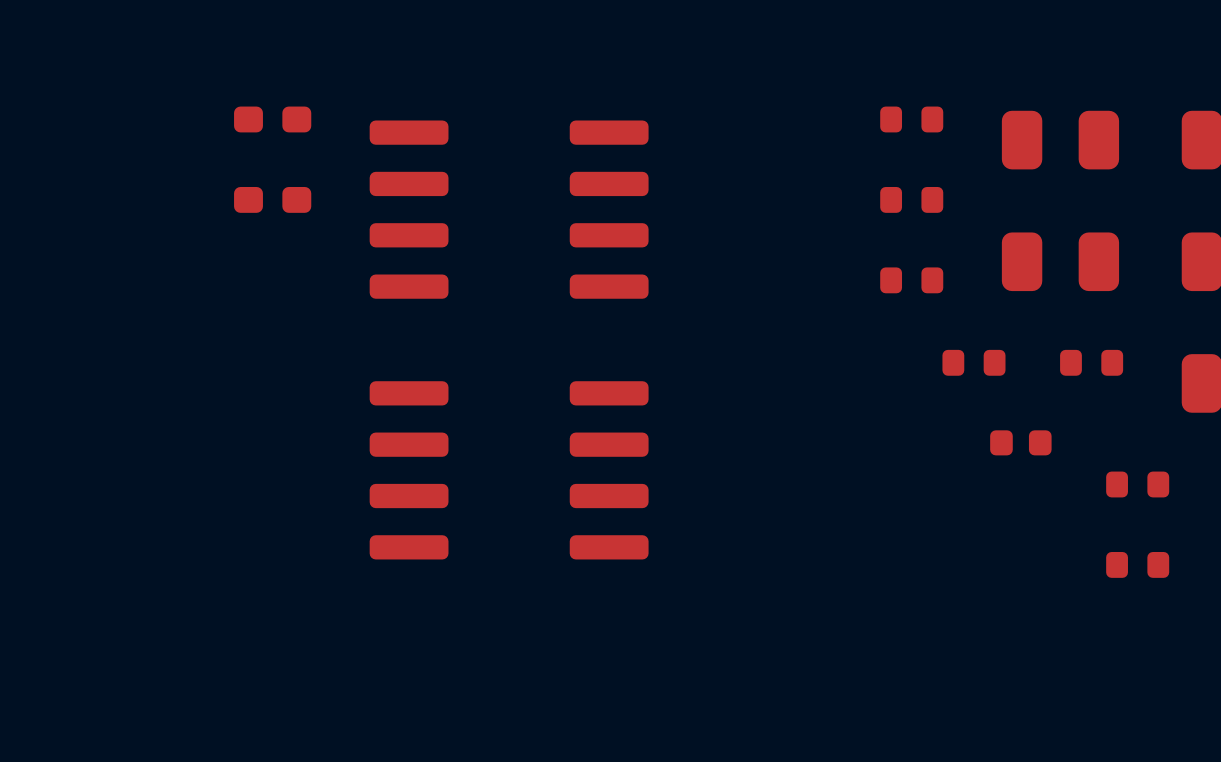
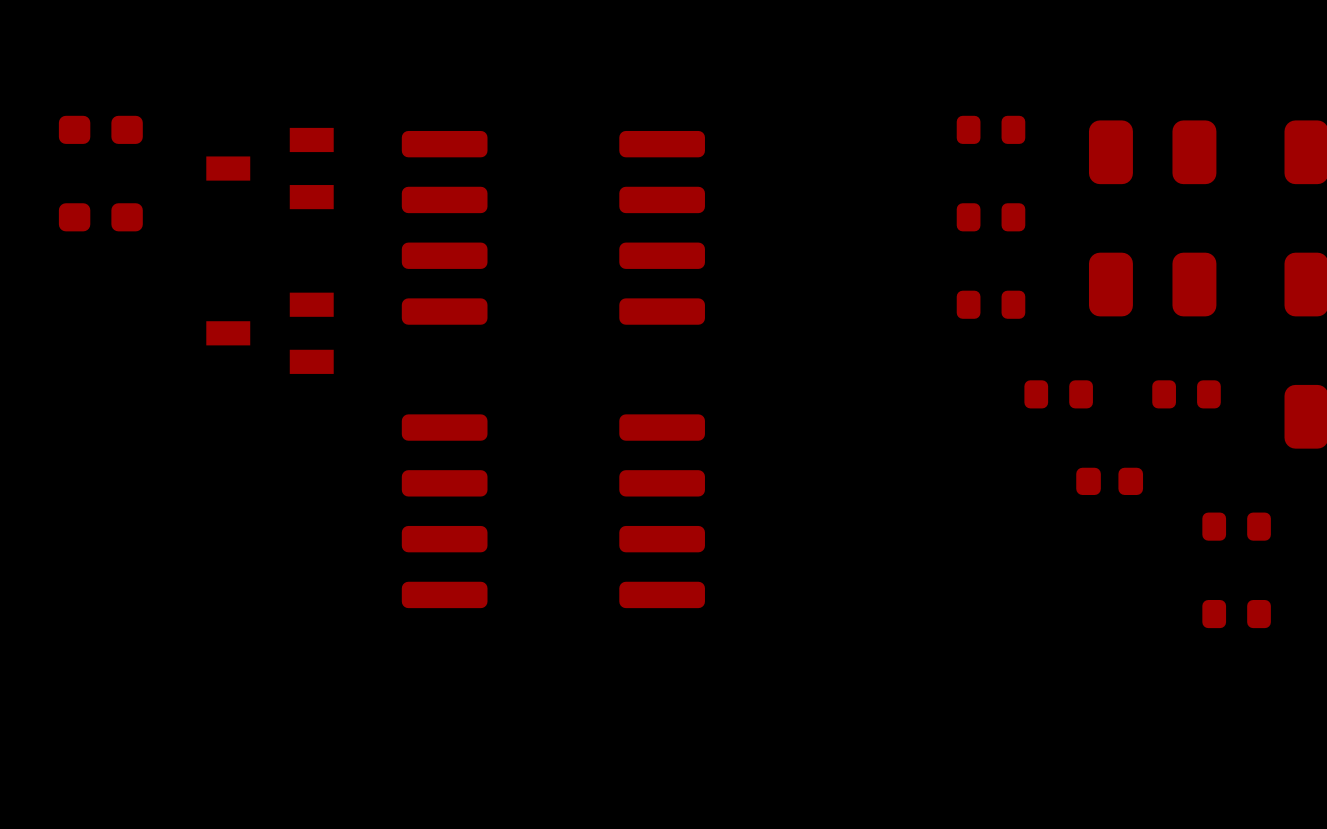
part: none -> (100, 129)
part: (272, 119) -> none
part: none -> (270, 168)
part: none -> (100, 217)
part: (272, 199) -> none
part: none -> (270, 333)

